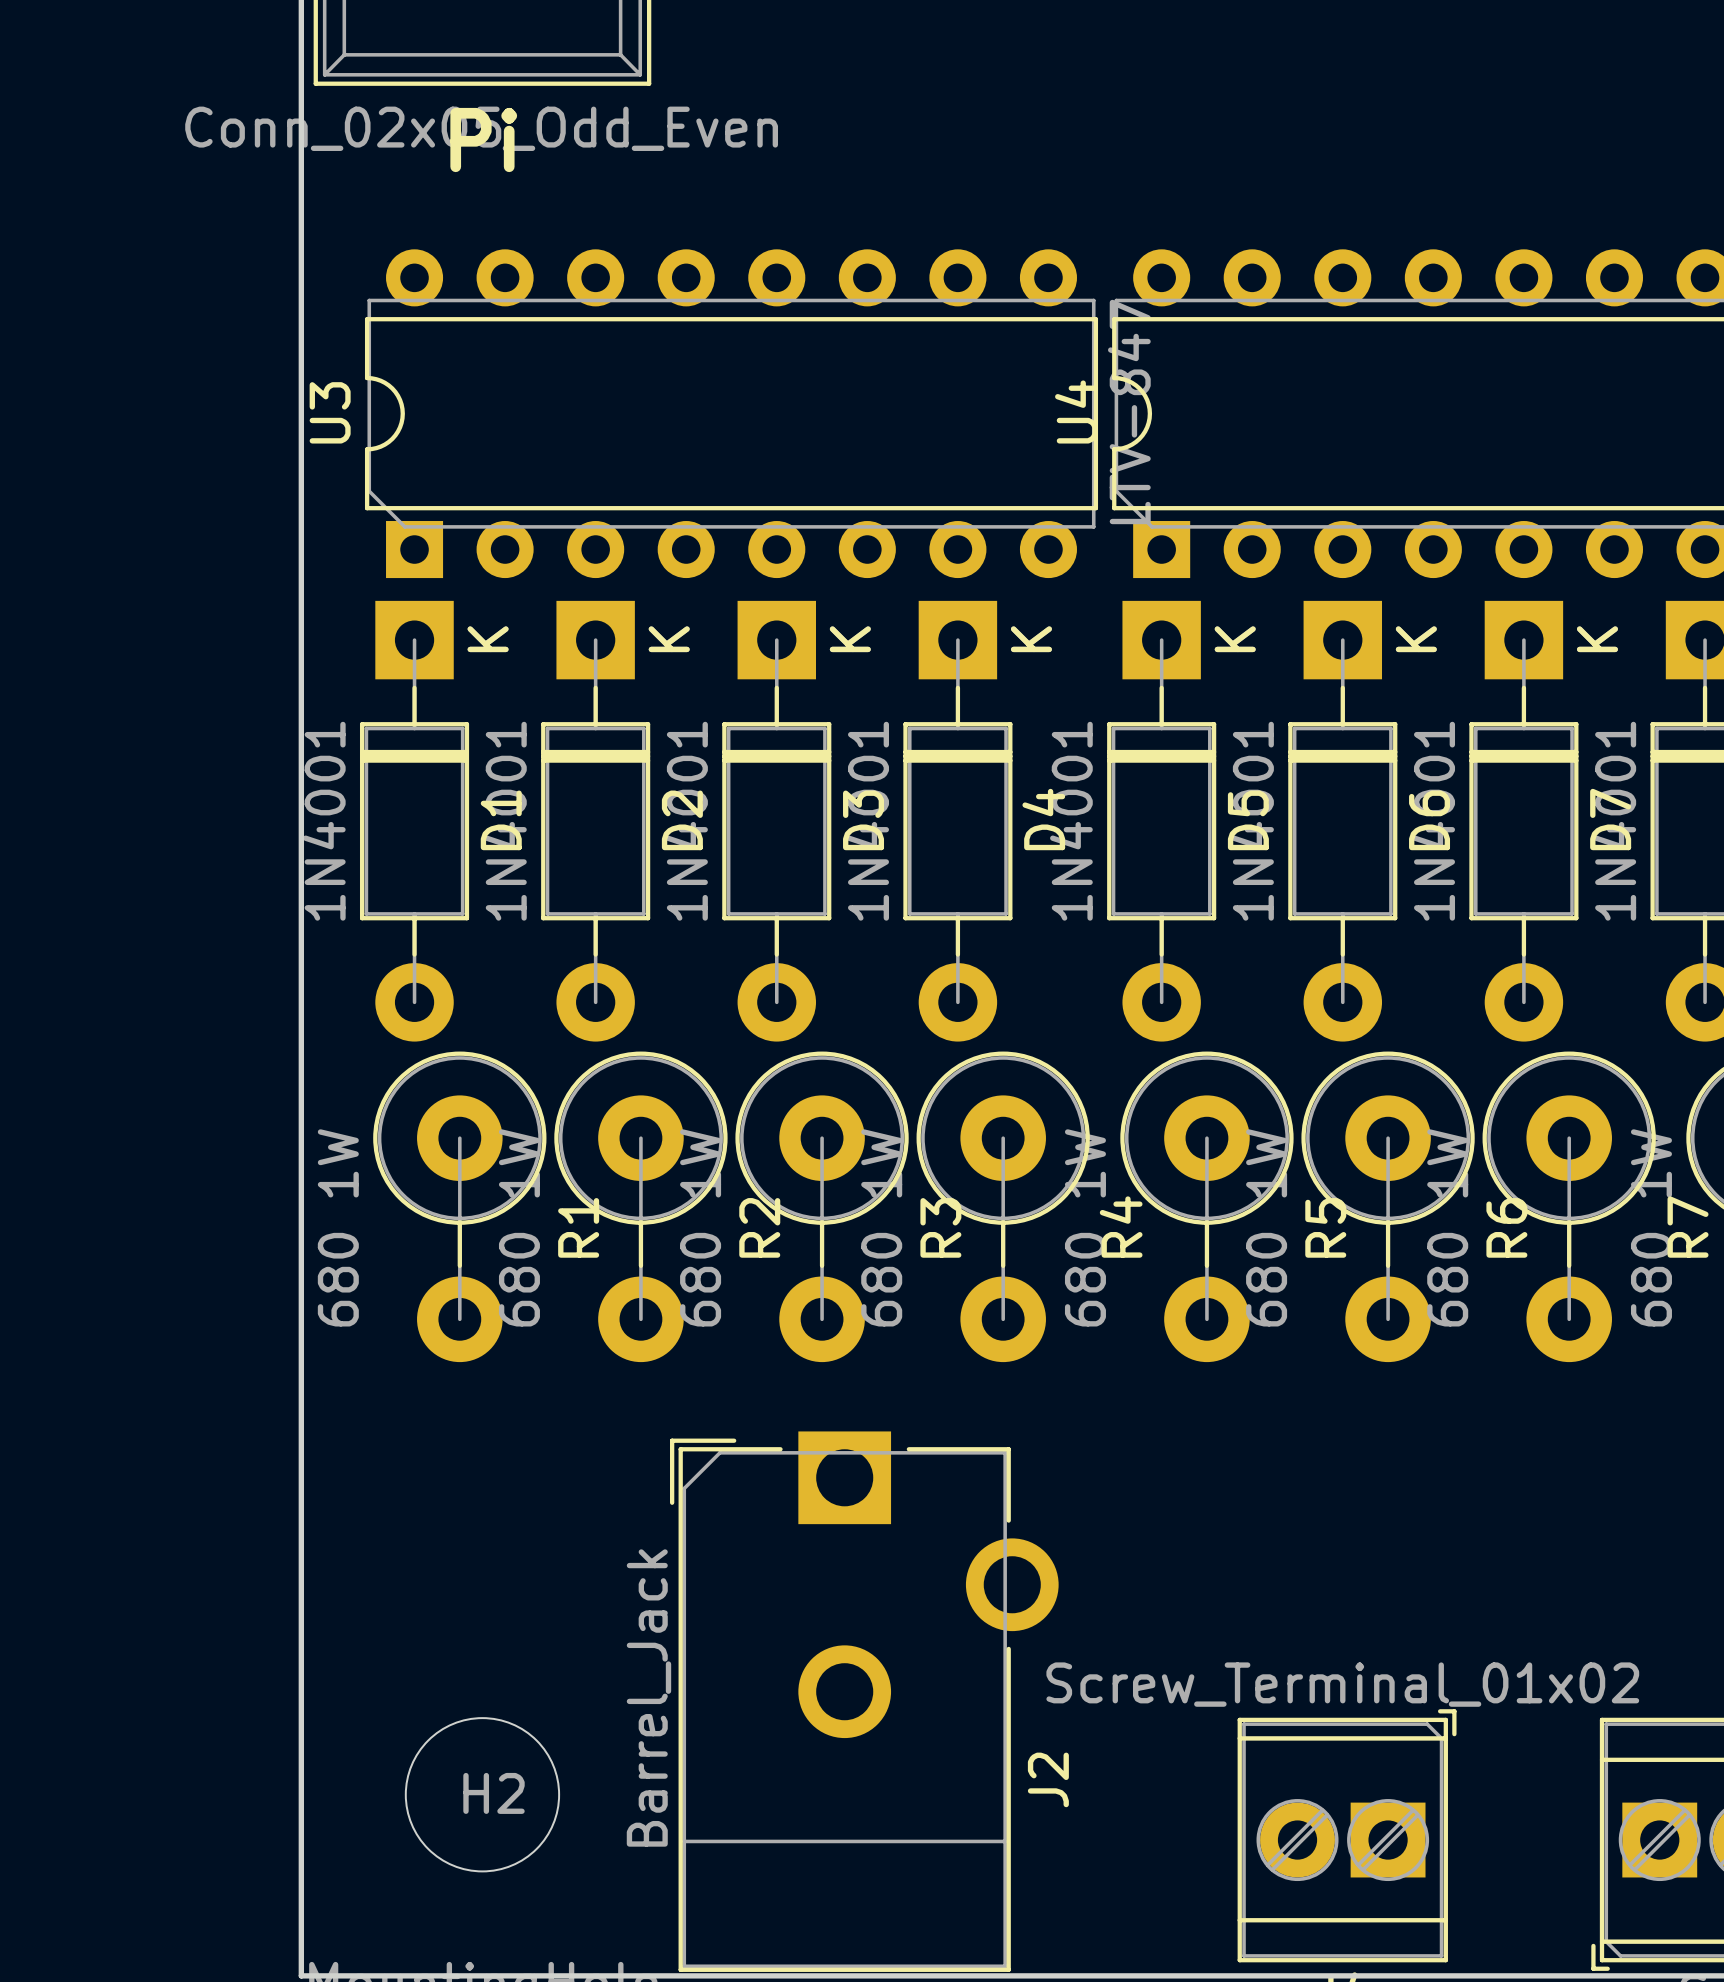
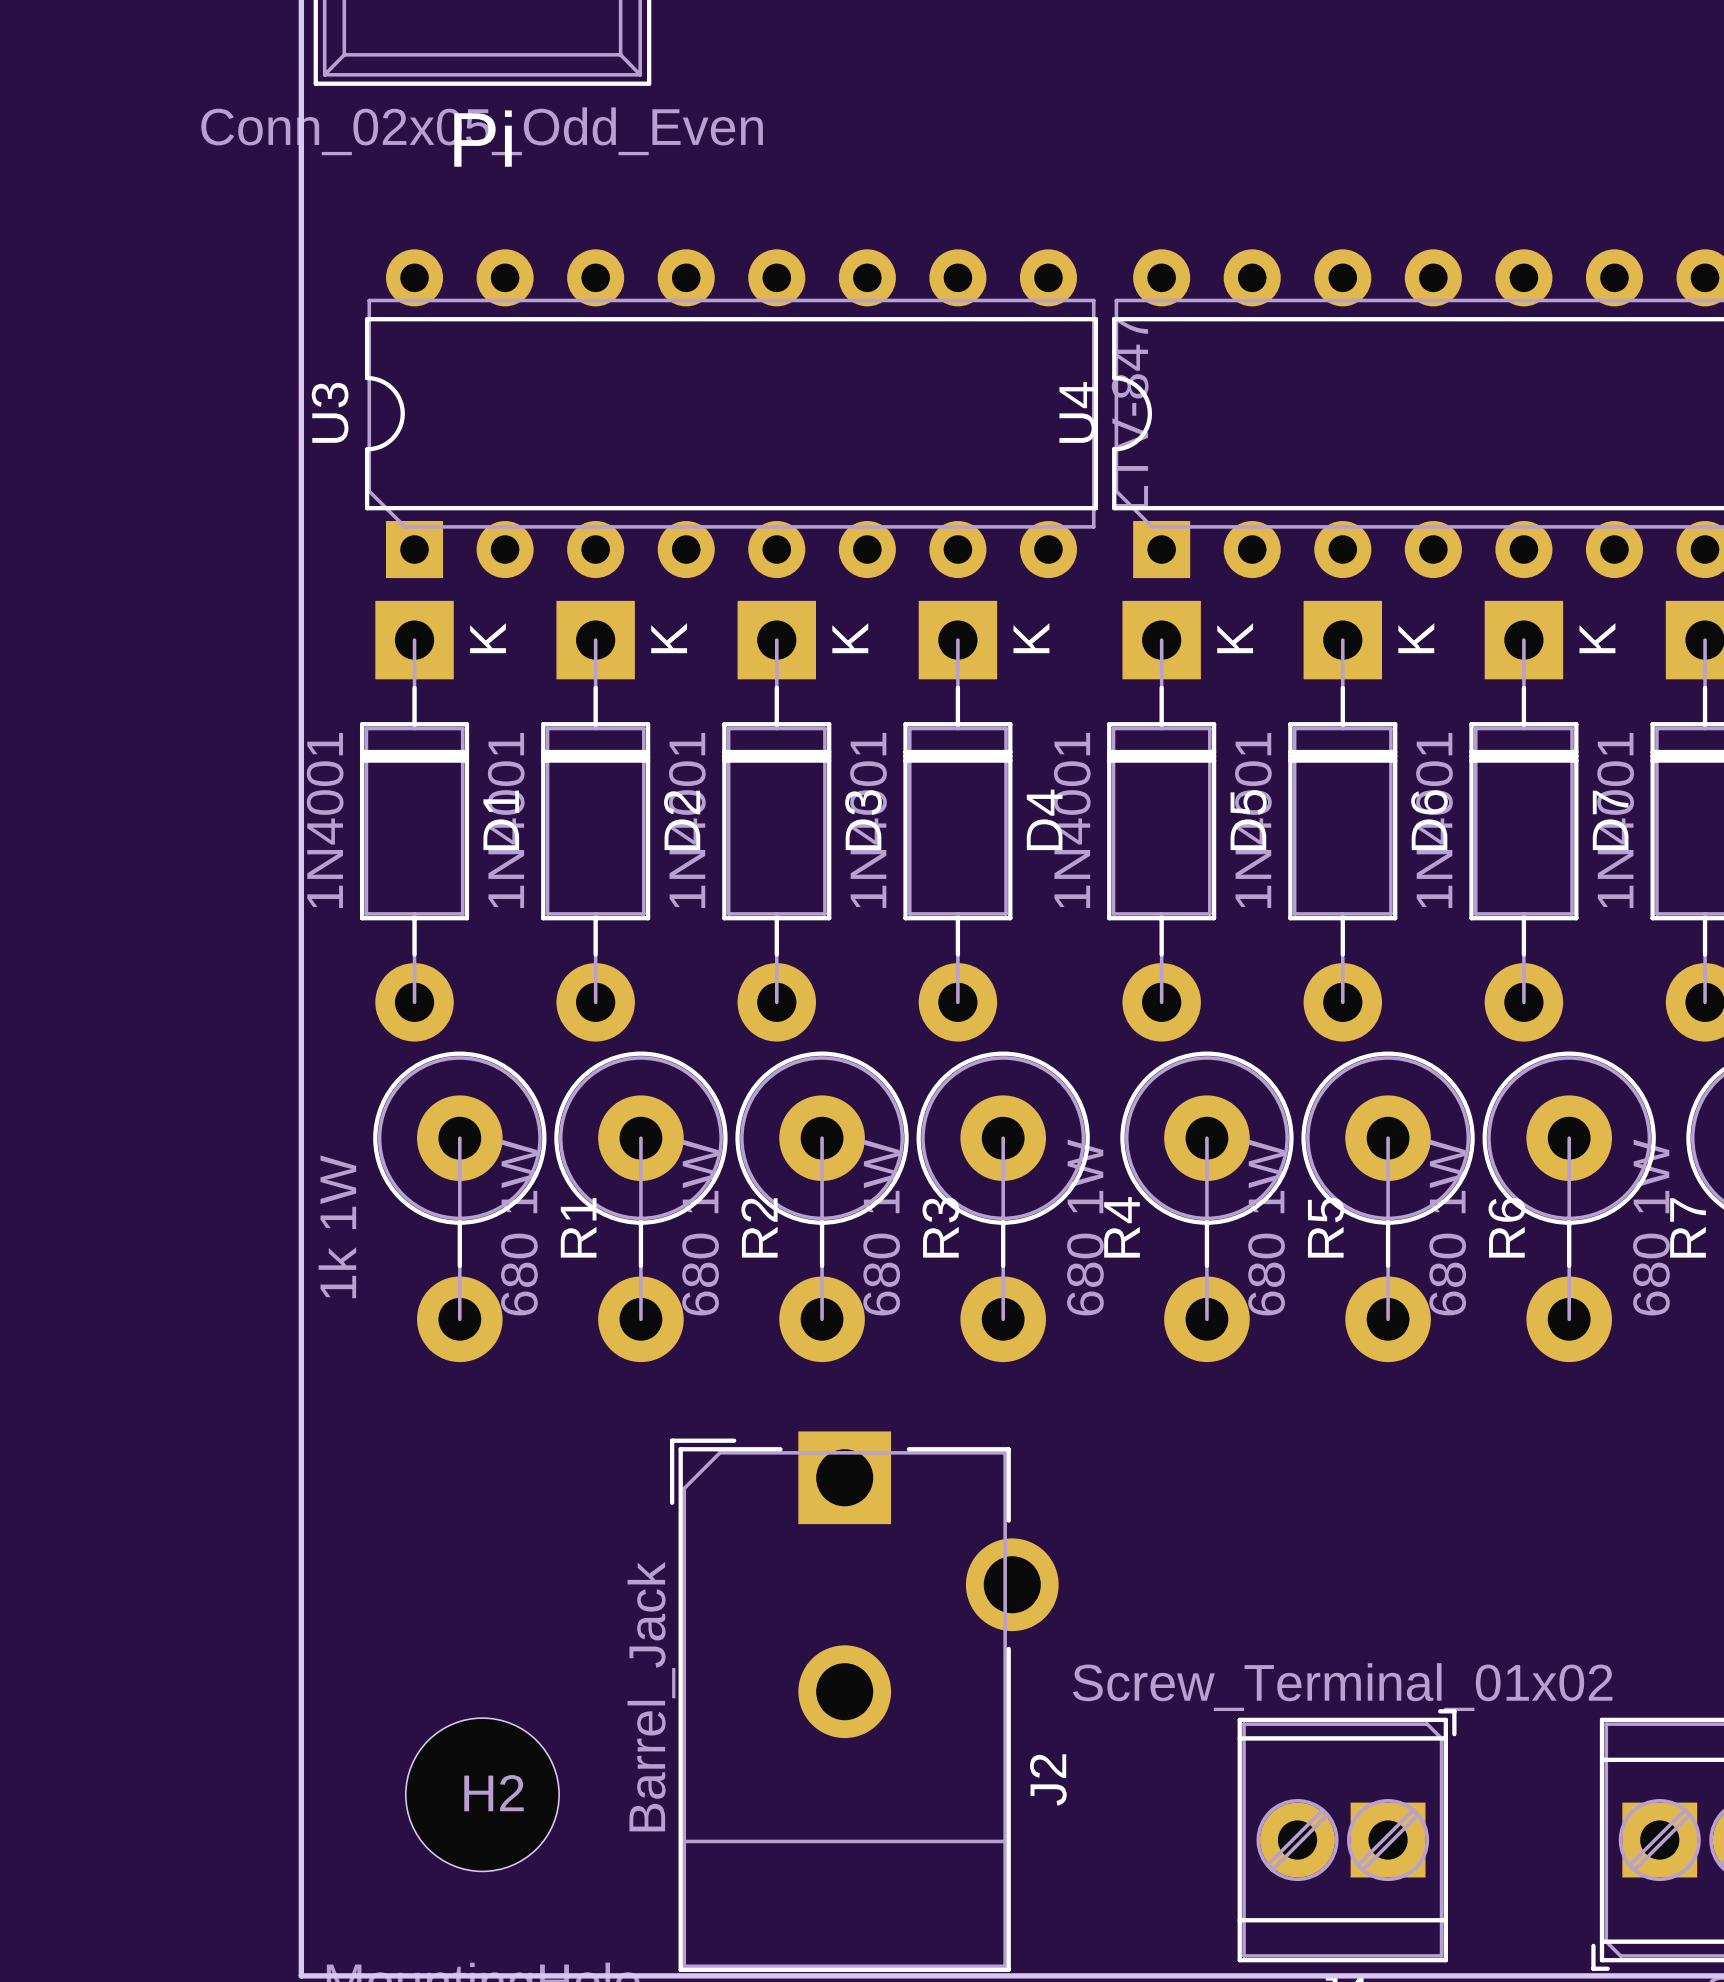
R1 value: 680 1W (338, 1227) -> 1k 1W (337, 1226)

